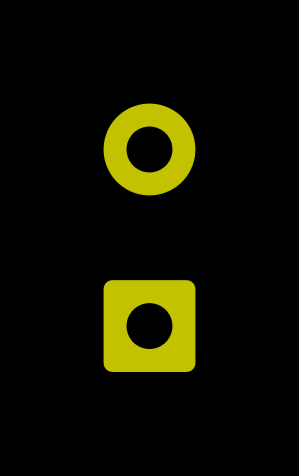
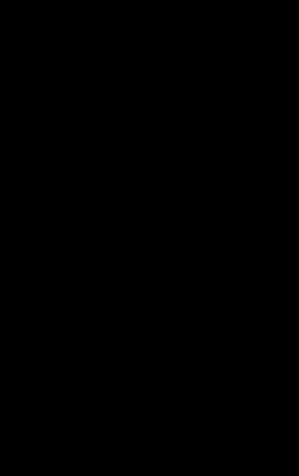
part: (149, 237) -> none

